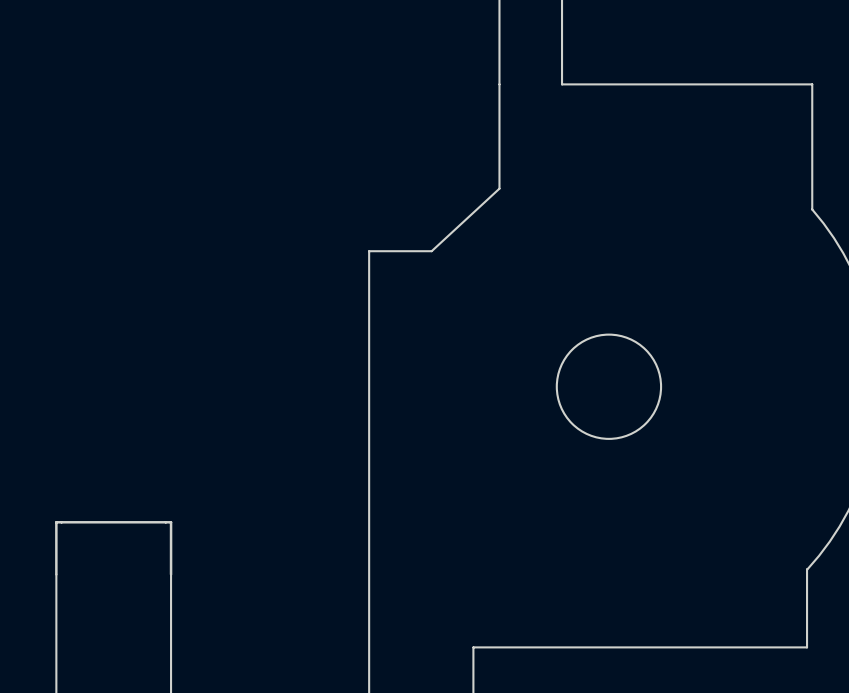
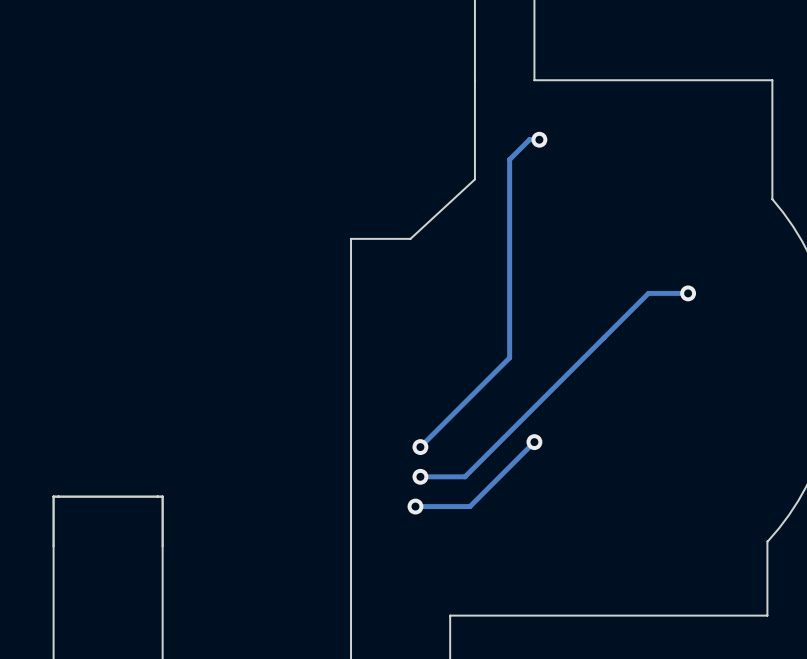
track: none -> (539, 139) (529, 139) (509, 159) (509, 357) (420, 447)
via: none -> (539, 139)
track: none -> (688, 293) (648, 293) (465, 476) (420, 476)
via: none -> (688, 293)
round board edge: [555, 333, 663, 440] -> none
track: none -> (534, 442) (469, 506) (415, 506)
via: none -> (534, 442)
via: none -> (420, 447)
via: none -> (420, 476)
via: none -> (415, 506)

